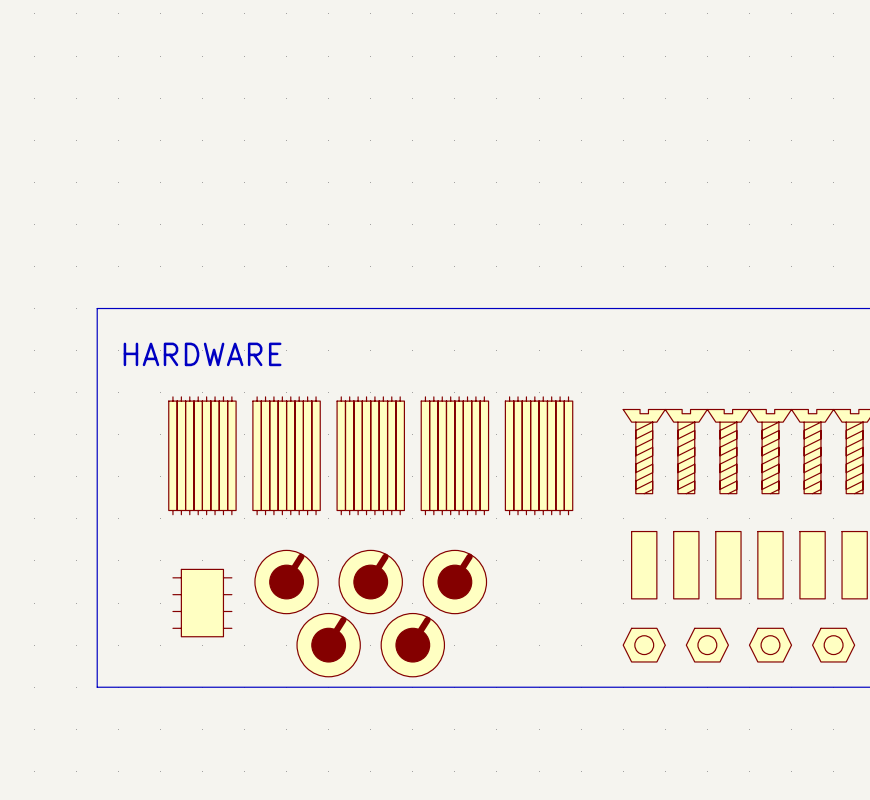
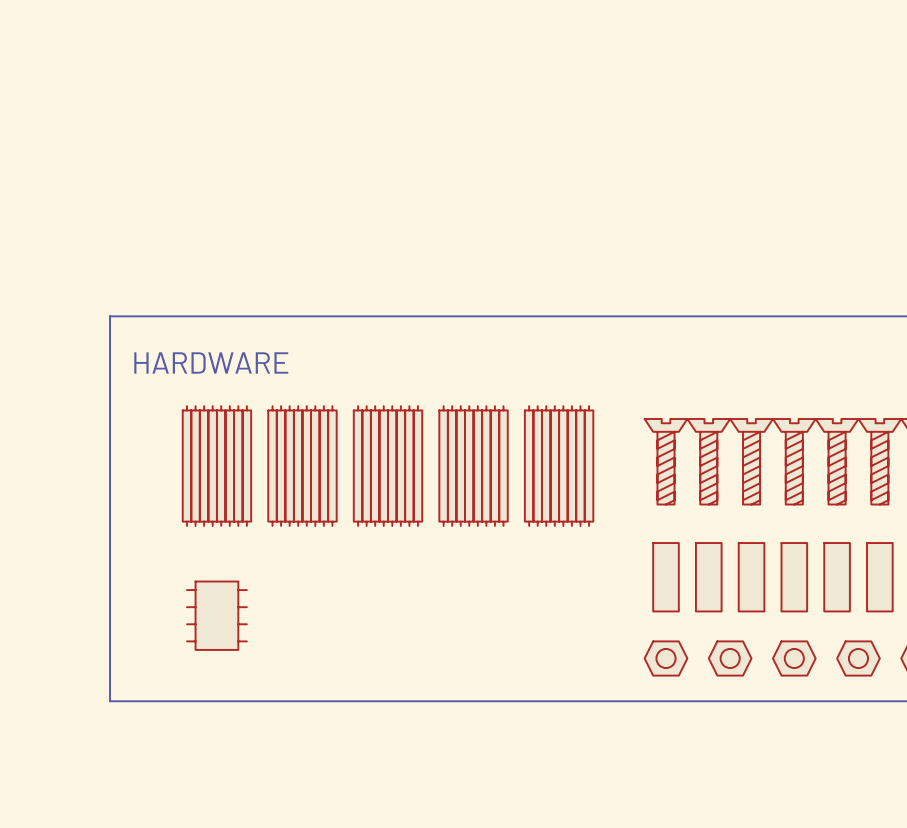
part: (286, 582) -> none
part: (370, 582) -> none
part: (454, 582) -> none
part: (328, 645) -> none
part: (412, 645) -> none

